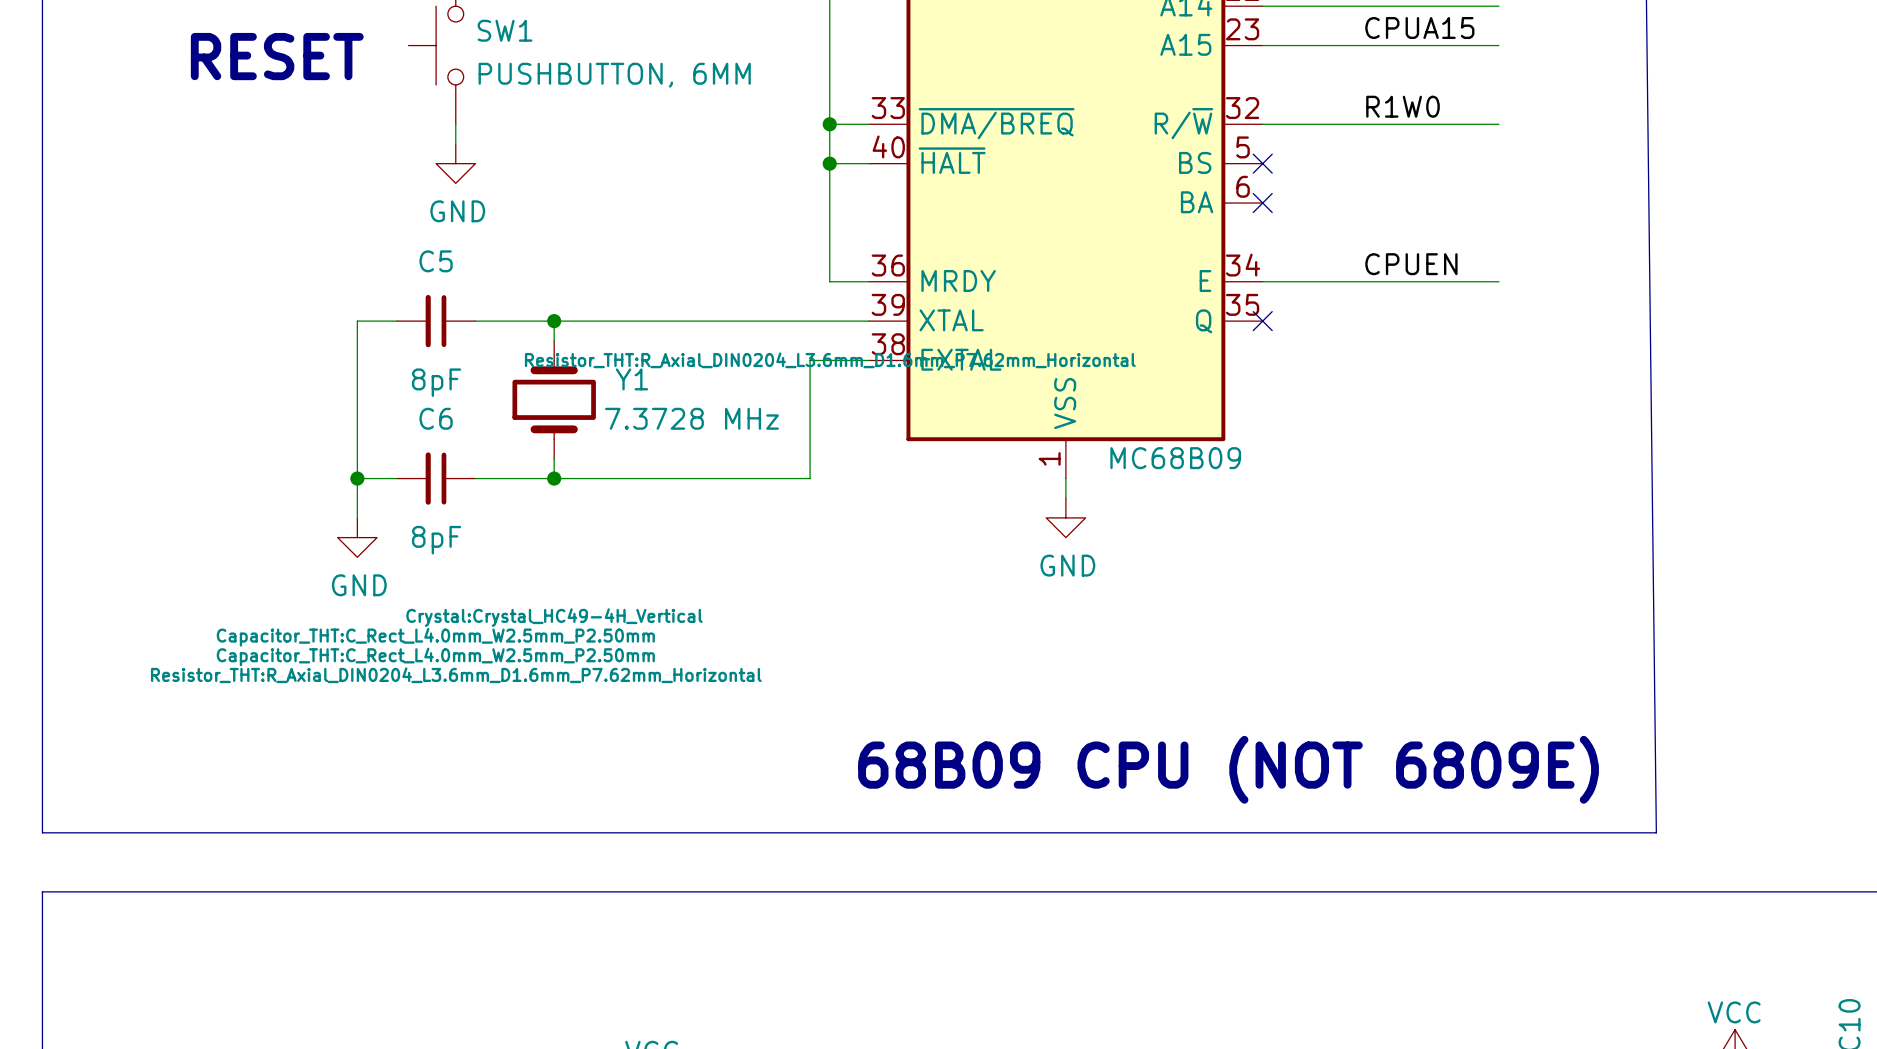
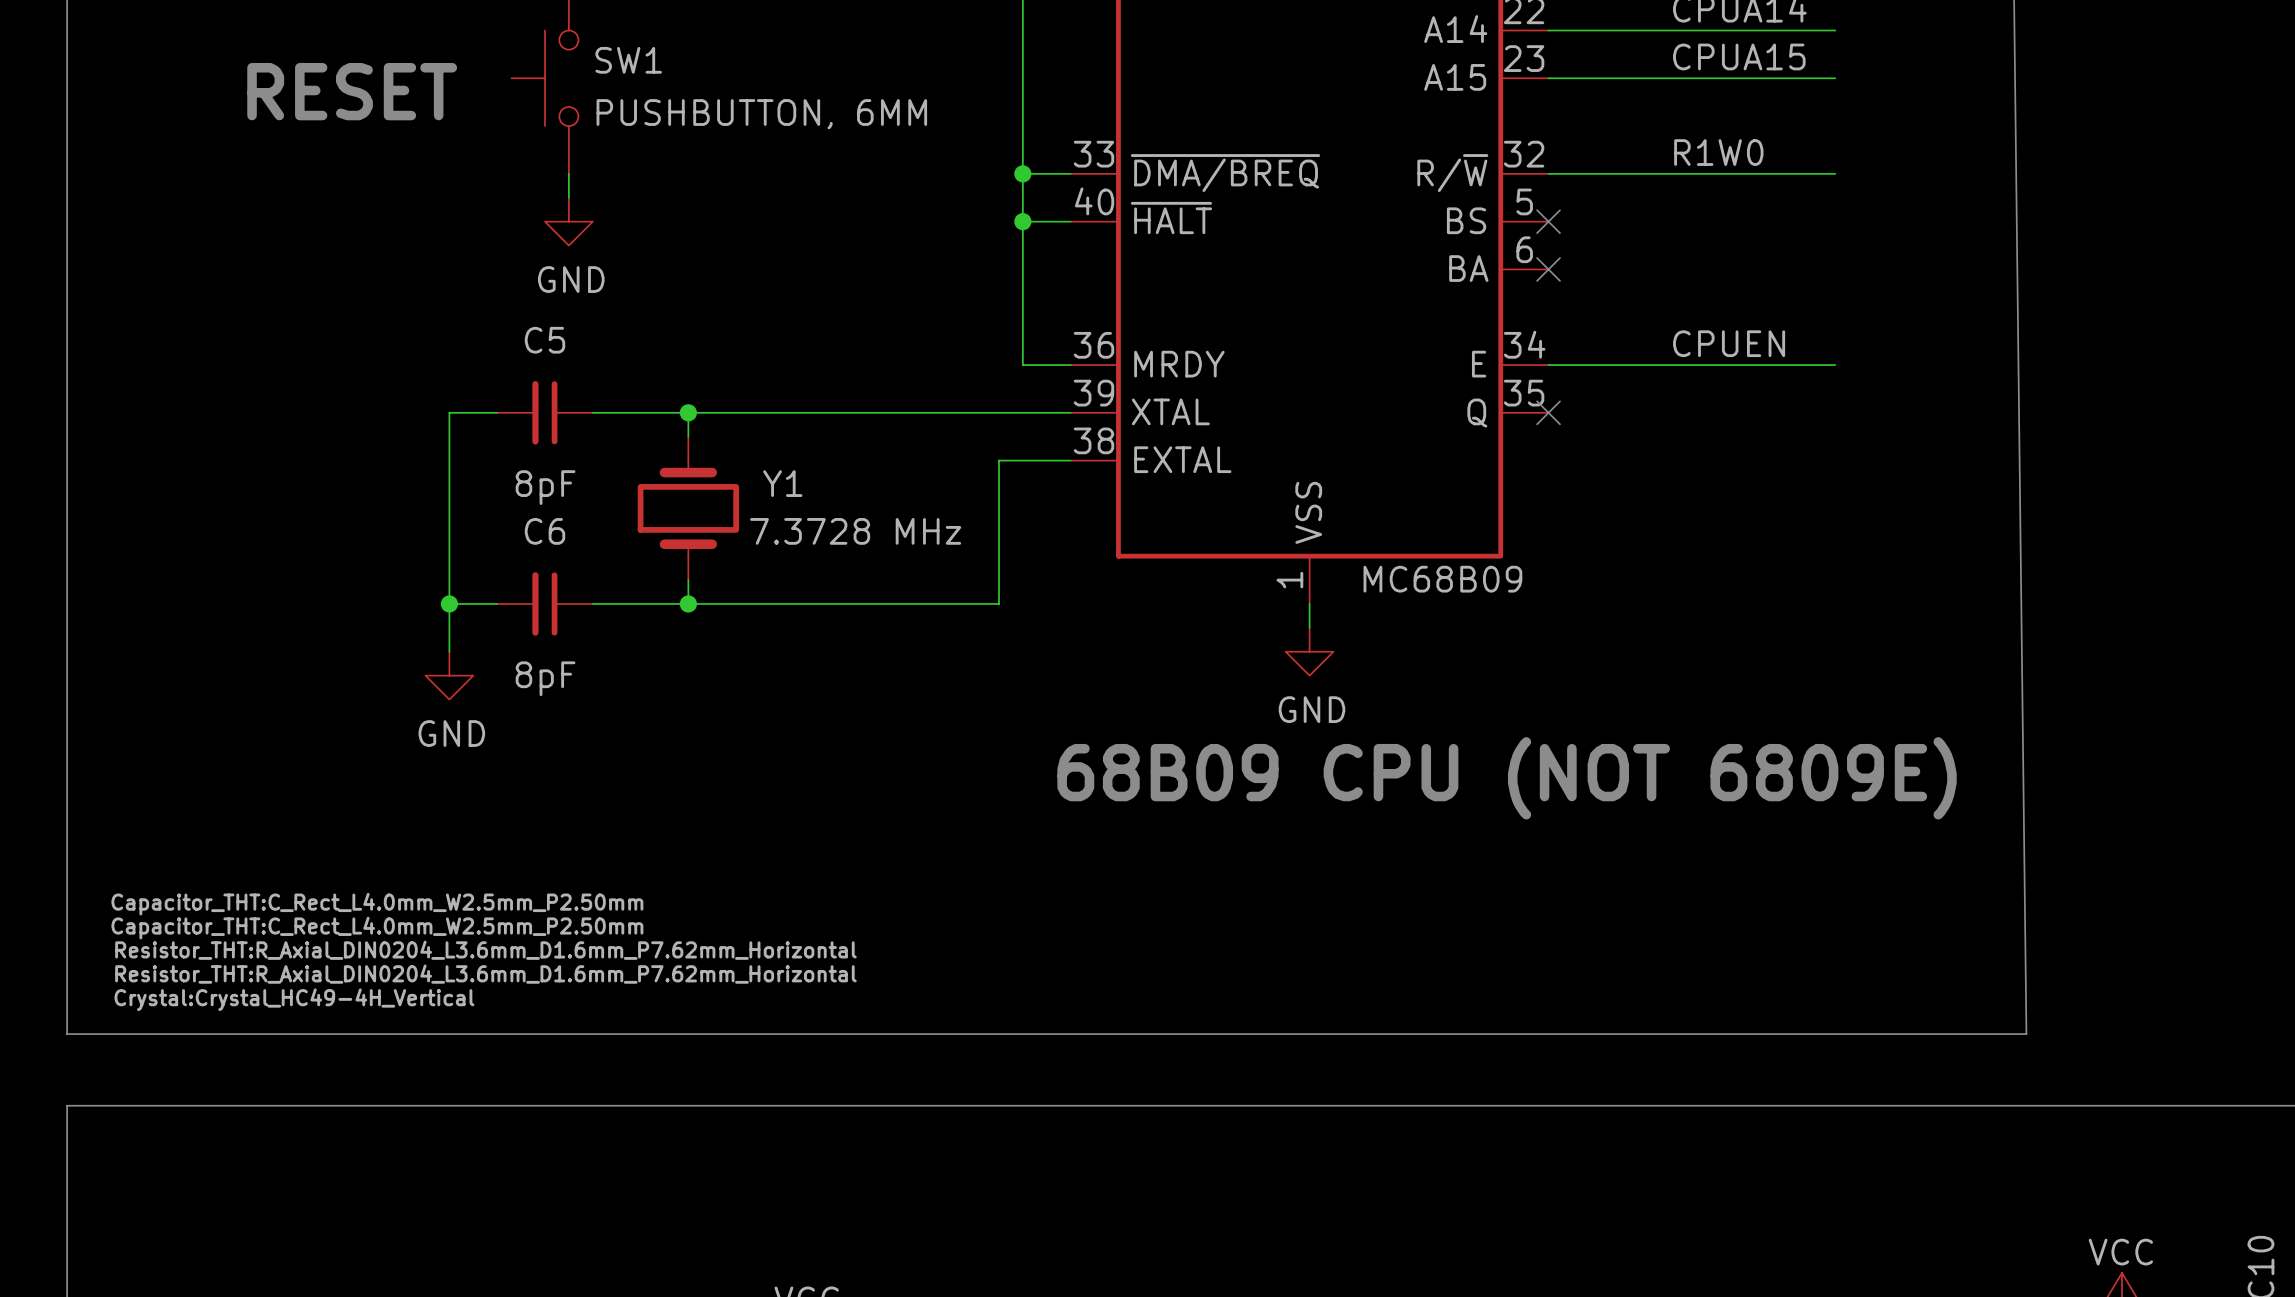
part text position: Resistor_THT:R_Axial_DIN0204_L3.6mm_D1.6mm_P7.62mm_Horizontal (830, 360) -> Resistor_THT:R_Axial_DIN0204_L3.6mm_D1.6mm_P7.62mm_Horizontal (485, 974)
Y1 text position: Crystal:Crystal_HC49-4H_Vertical (554, 617) -> Crystal:Crystal_HC49-4H_Vertical (294, 999)
C5 text position: Capacitor_THT:C_Rect_L4.0mm_W2.5mm_P2.50mm (435, 637) -> Capacitor_THT:C_Rect_L4.0mm_W2.5mm_P2.50mm (377, 904)
C6 text position: Capacitor_THT:C_Rect_L4.0mm_W2.5mm_P2.50mm (435, 656) -> Capacitor_THT:C_Rect_L4.0mm_W2.5mm_P2.50mm (377, 928)
part text position: Resistor_THT:R_Axial_DIN0204_L3.6mm_D1.6mm_P7.62mm_Horizontal (456, 675) -> Resistor_THT:R_Axial_DIN0204_L3.6mm_D1.6mm_P7.62mm_Horizontal (485, 950)
text position: 68B09 CPU (NOT 6809E) (1228, 769) -> 68B09 CPU (NOT 6809E) (1507, 778)

